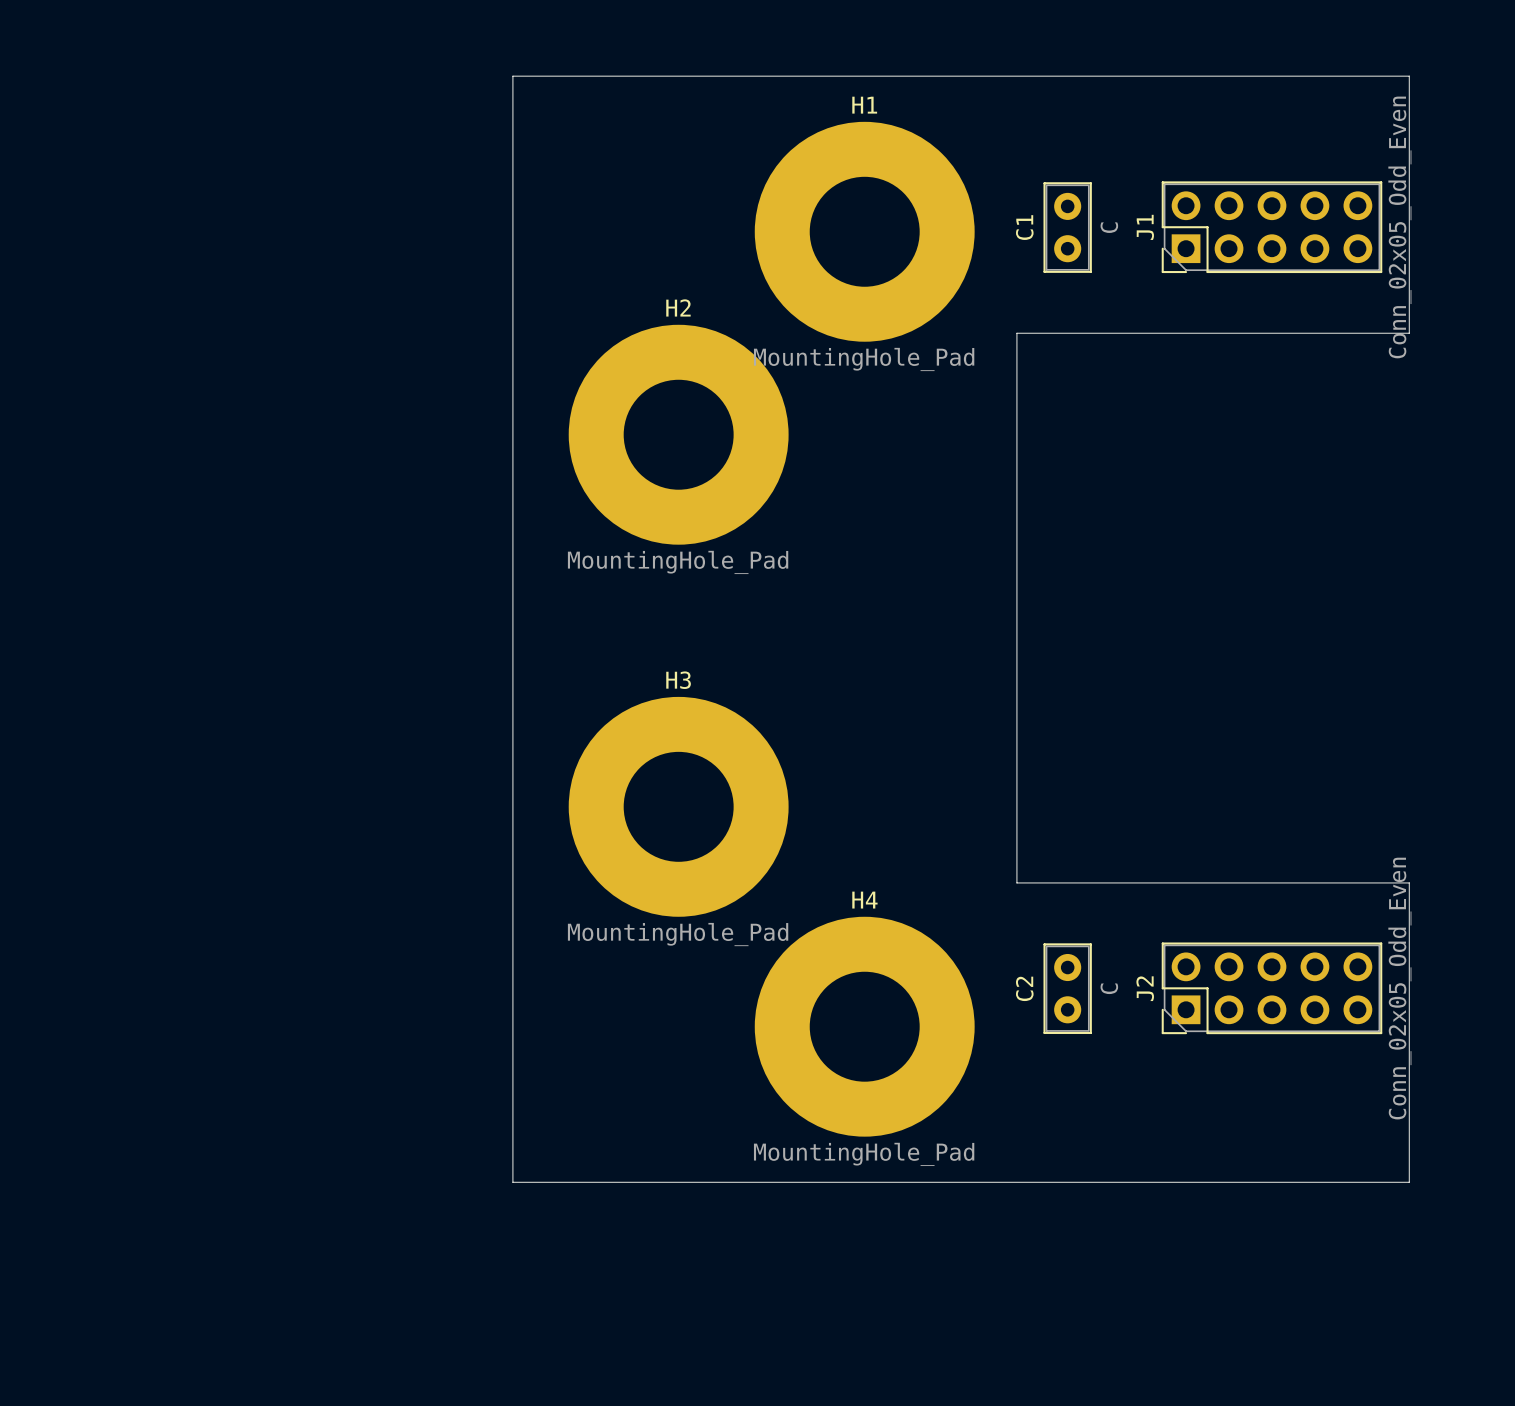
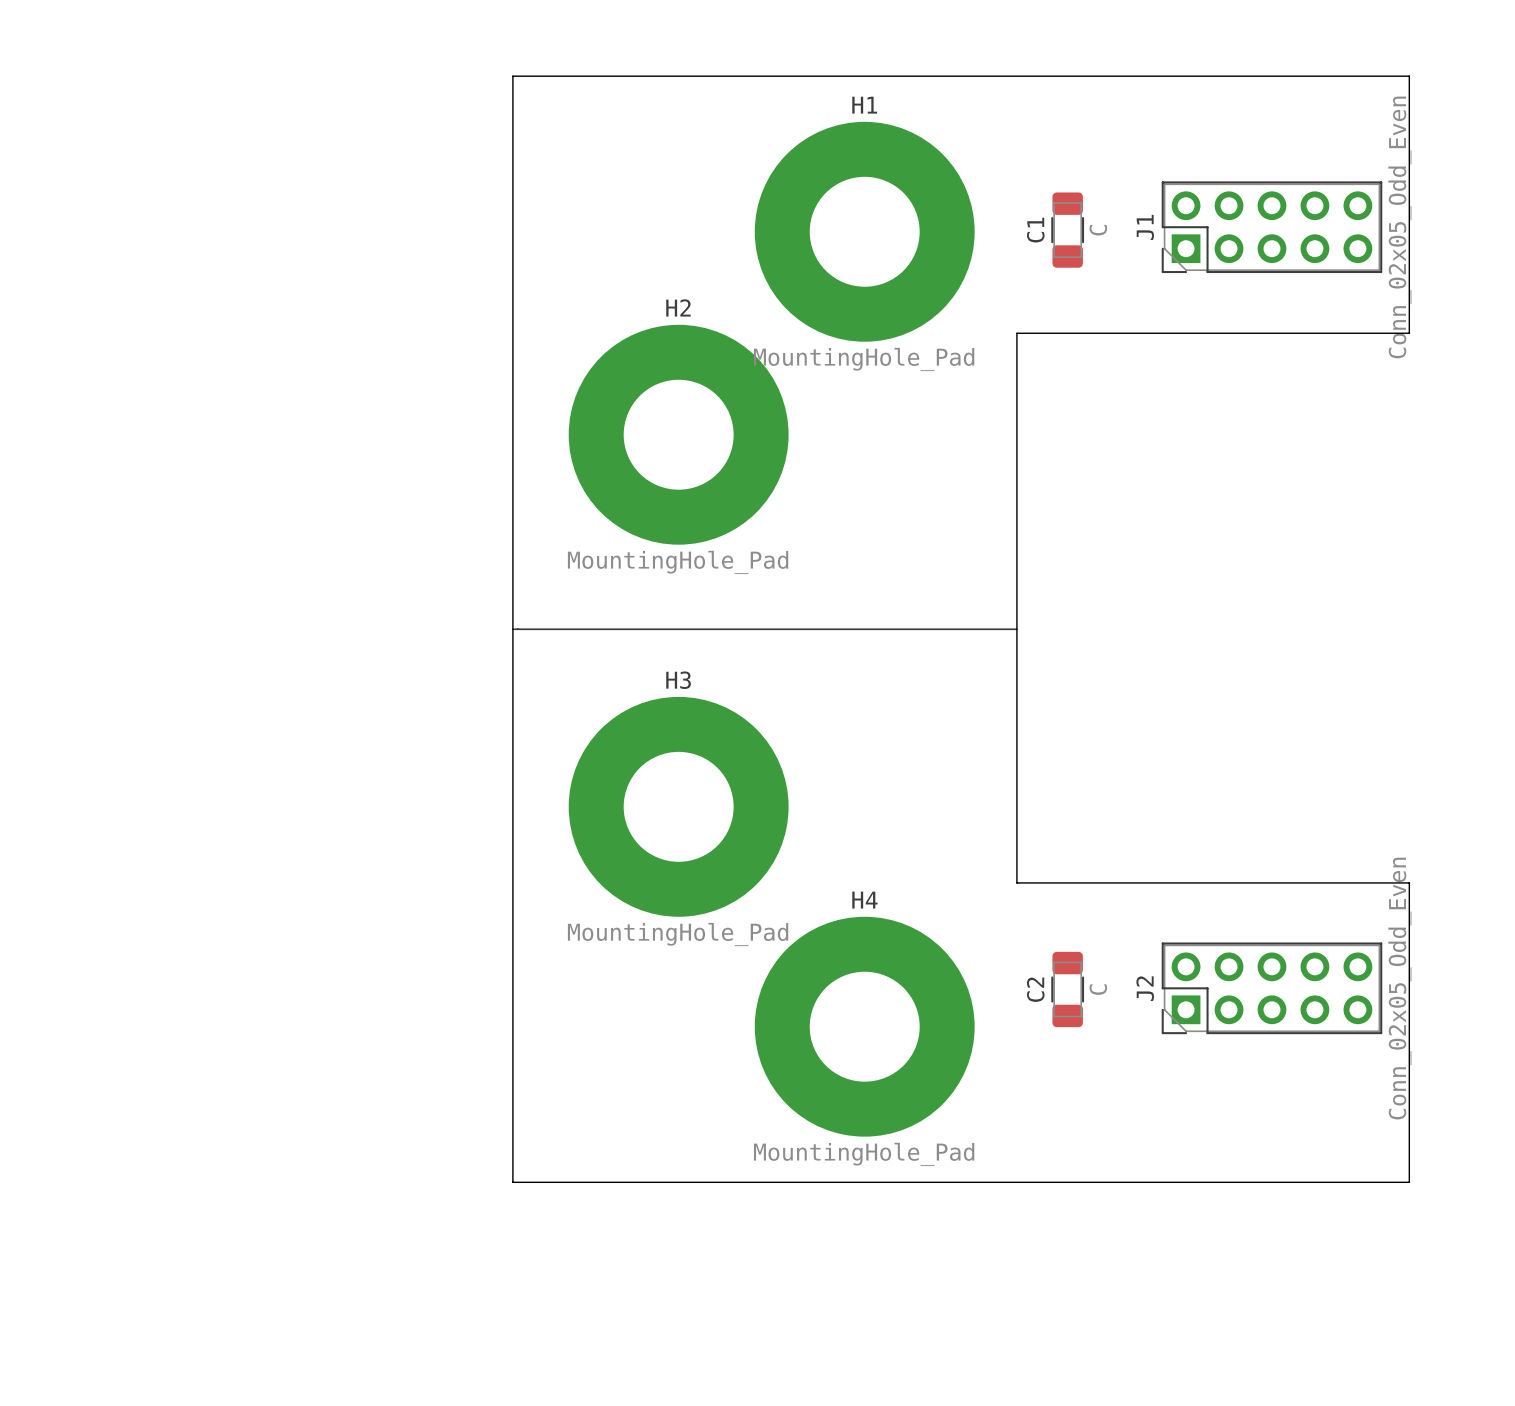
C1 footprint: [1043, 182, 1092, 273] -> [1051, 192, 1085, 268]
line: none -> (512, 629) (1016, 629)
C2 footprint: [1043, 943, 1092, 1034] -> [1051, 951, 1085, 1028]

